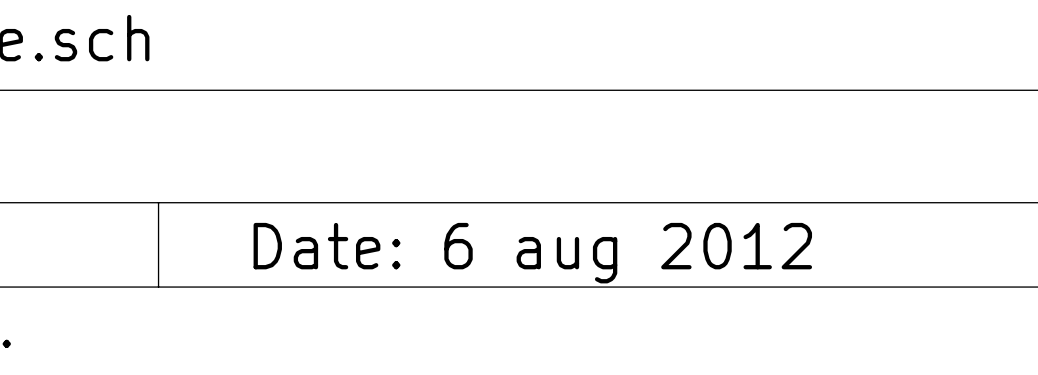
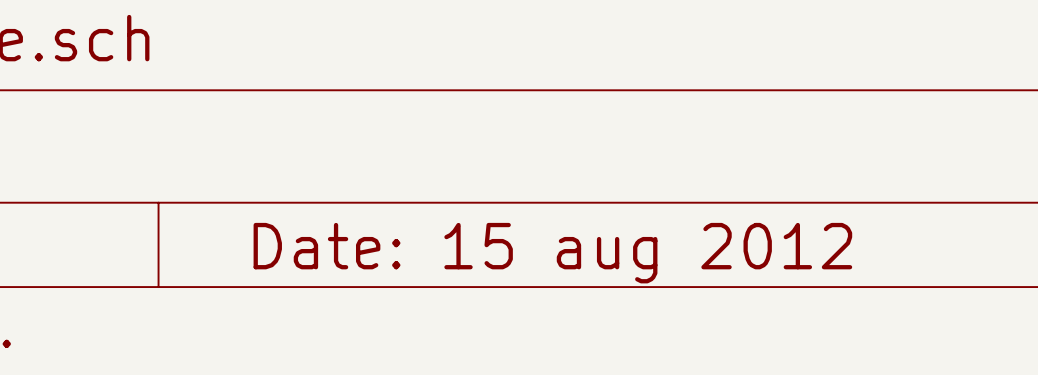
title block: Date: 6 aug 2012 (532, 253) -> Date: 15 aug 2012 (552, 253)

